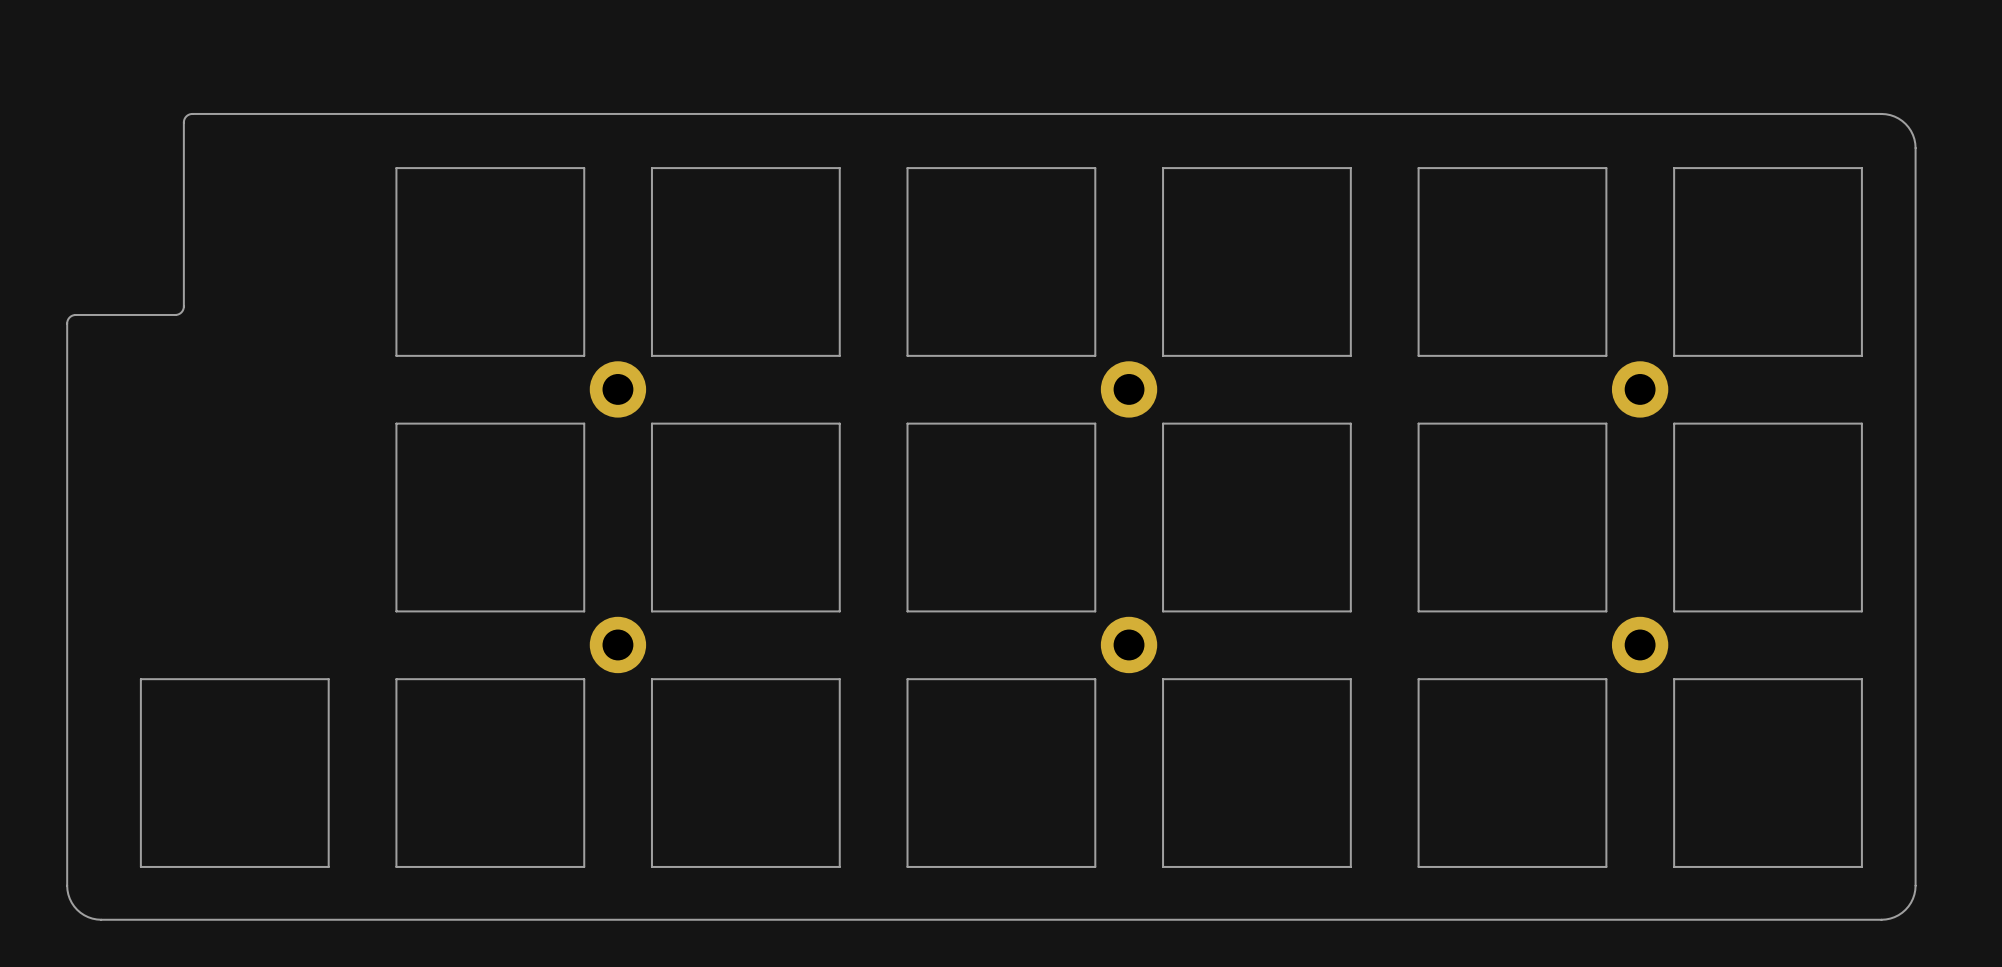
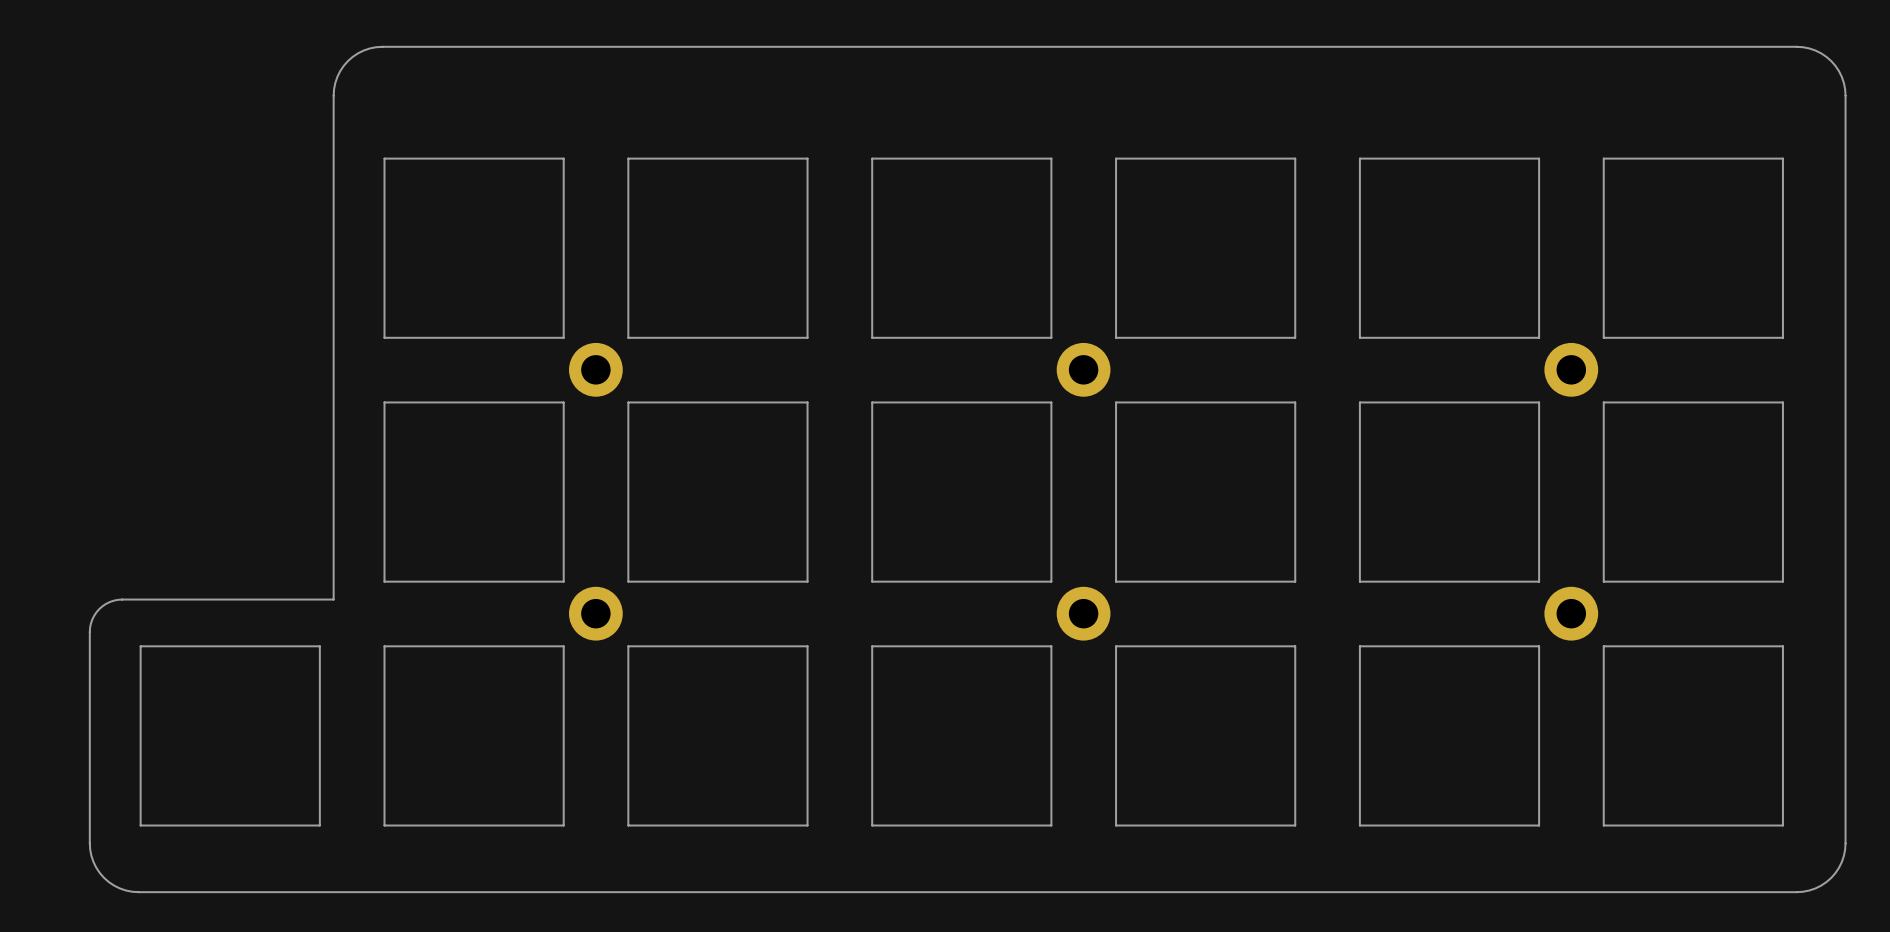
board edge: (1881, 113) (189, 114) (183, 122) (182, 310) (175, 314) (74, 315) (69, 317) (67, 322) (67, 885) (69, 898) (80, 912) (92, 918) (101, 919) (1881, 919) (1894, 917) (1908, 906) (1912, 898) (1915, 885) (1915, 148) (1912, 134) (1905, 123) (1894, 116) (1881, 113) -> (1796, 46) (1815, 50) (1831, 61) (1841, 76) (1845, 95) (1845, 843) (1843, 856) (1835, 873) (1826, 882) (1815, 888) (1796, 892) (138, 892) (125, 890) (114, 885) (104, 877) (93, 862) (89, 843) (89, 632) (92, 619) (99, 609) (109, 602) (122, 599) (333, 599) (333, 95) (335, 82) (340, 71) (347, 61) (363, 50) (382, 46) (1796, 46)

